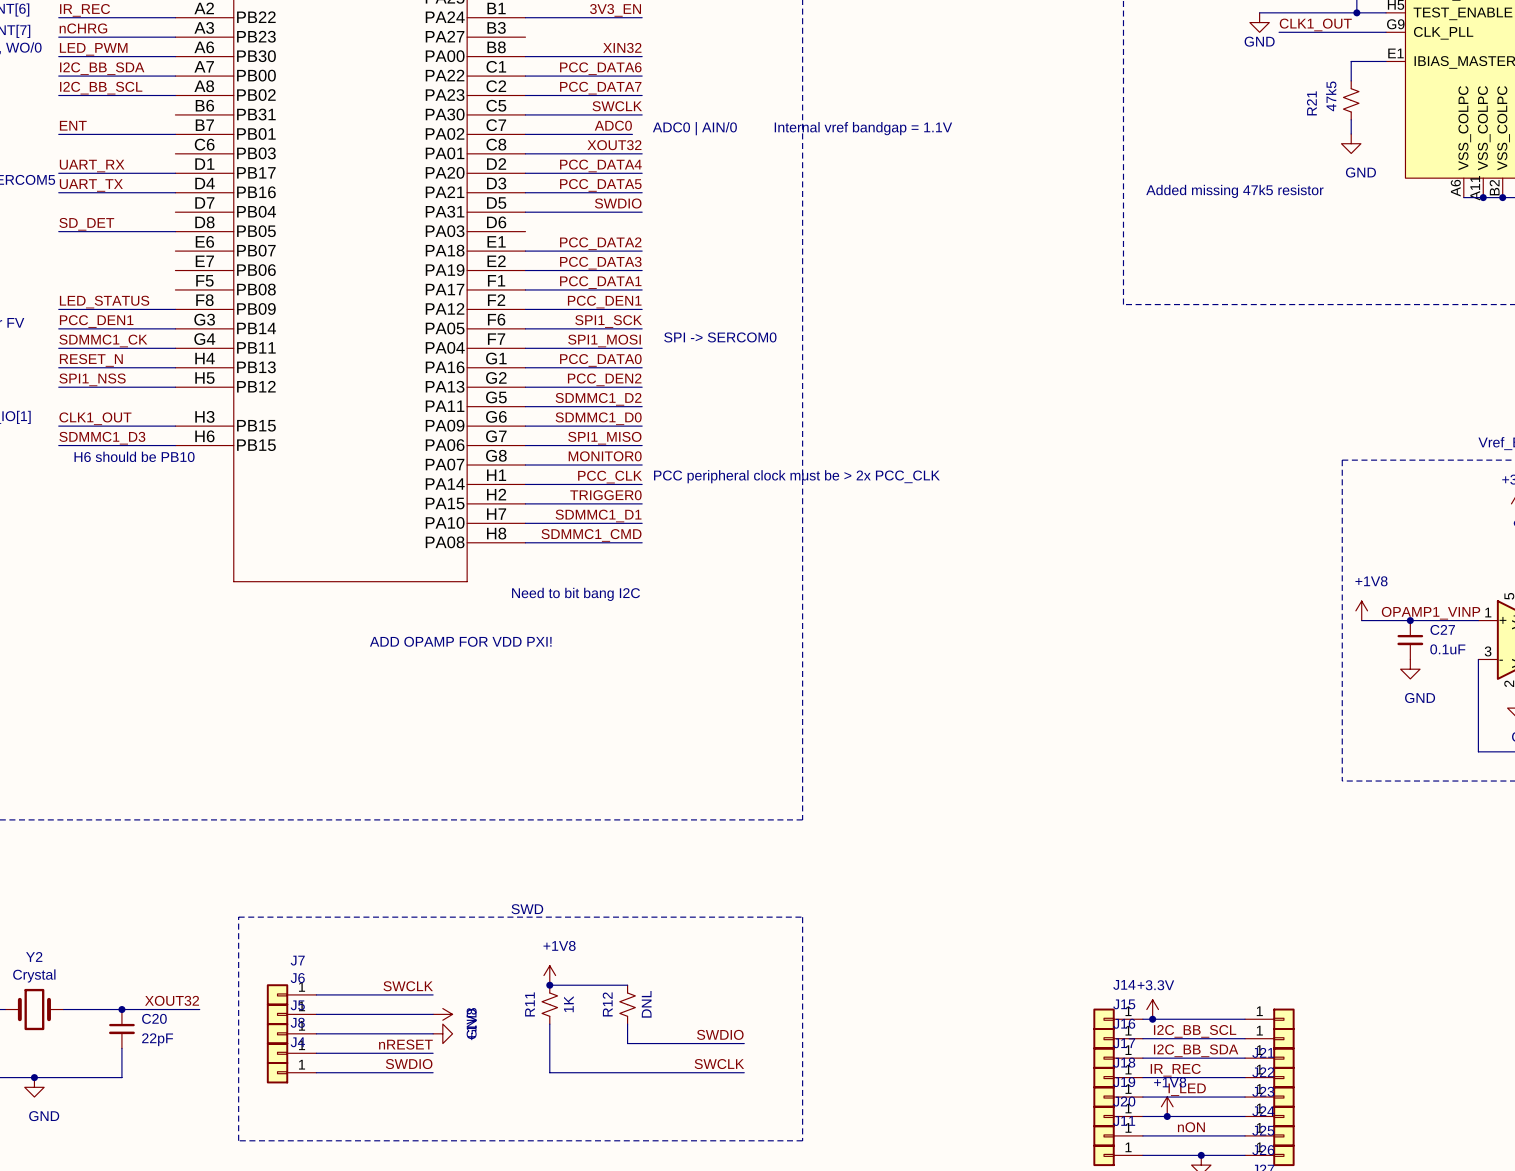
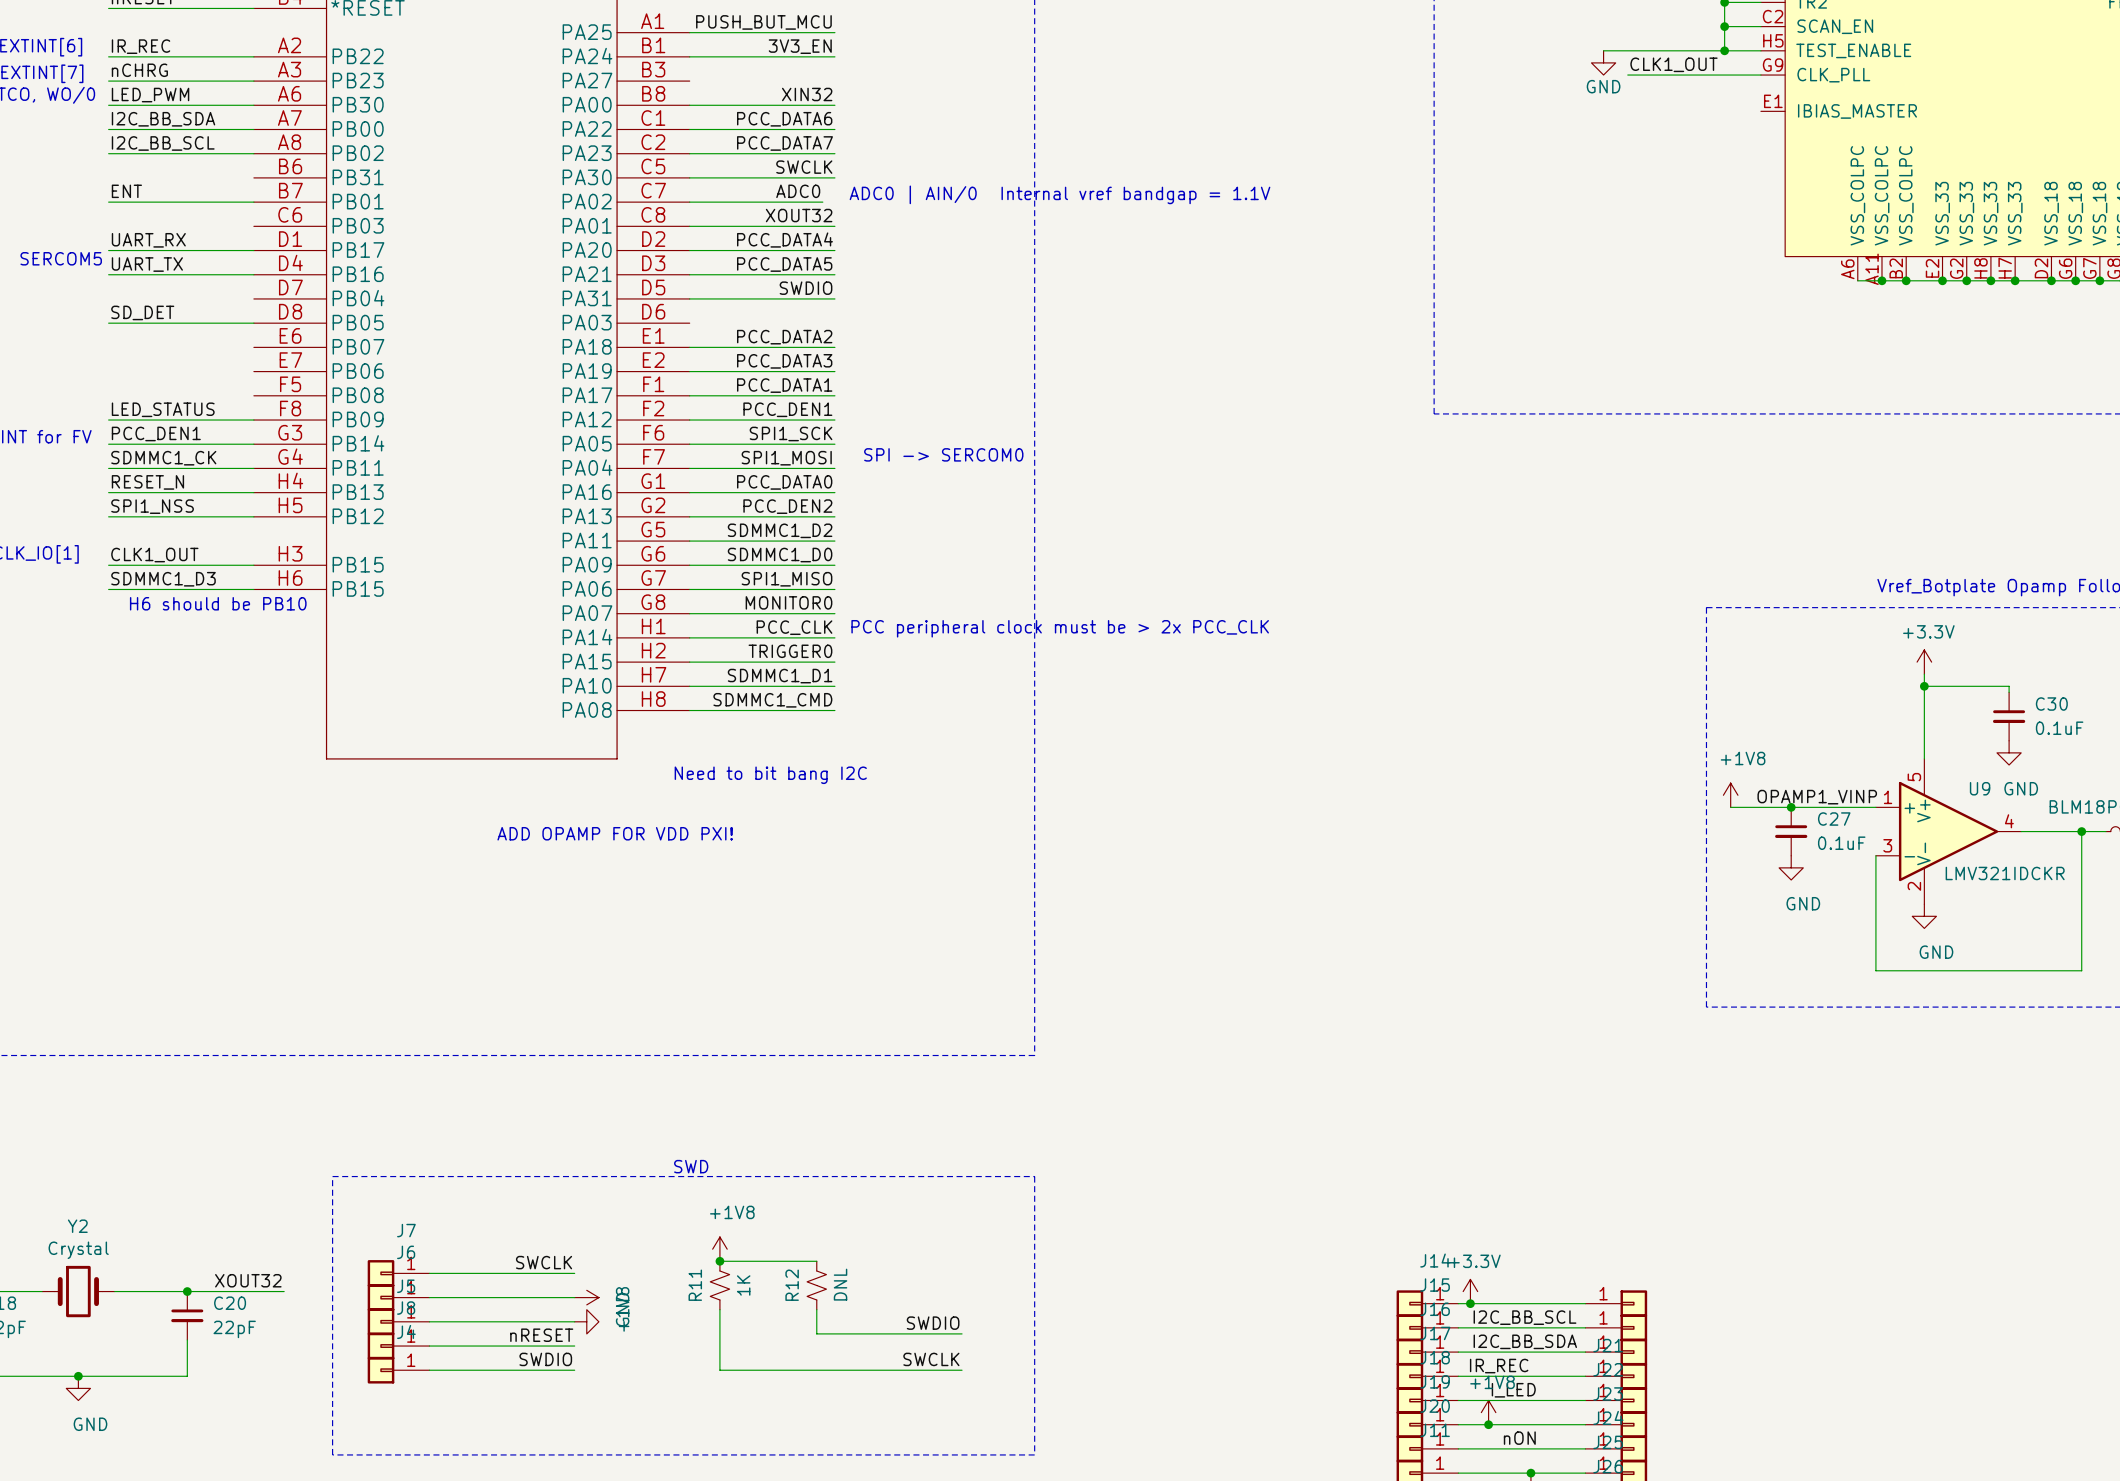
wire: (1386, 61) (1351, 61) (1351, 80) -> none
R21: 47k5 (1351, 100) -> none
wire: (1351, 119) (1351, 134) -> none
power symbol: GND (1351, 143) -> none
text: Added missing 47k5 resistor (1234, 191) -> none

